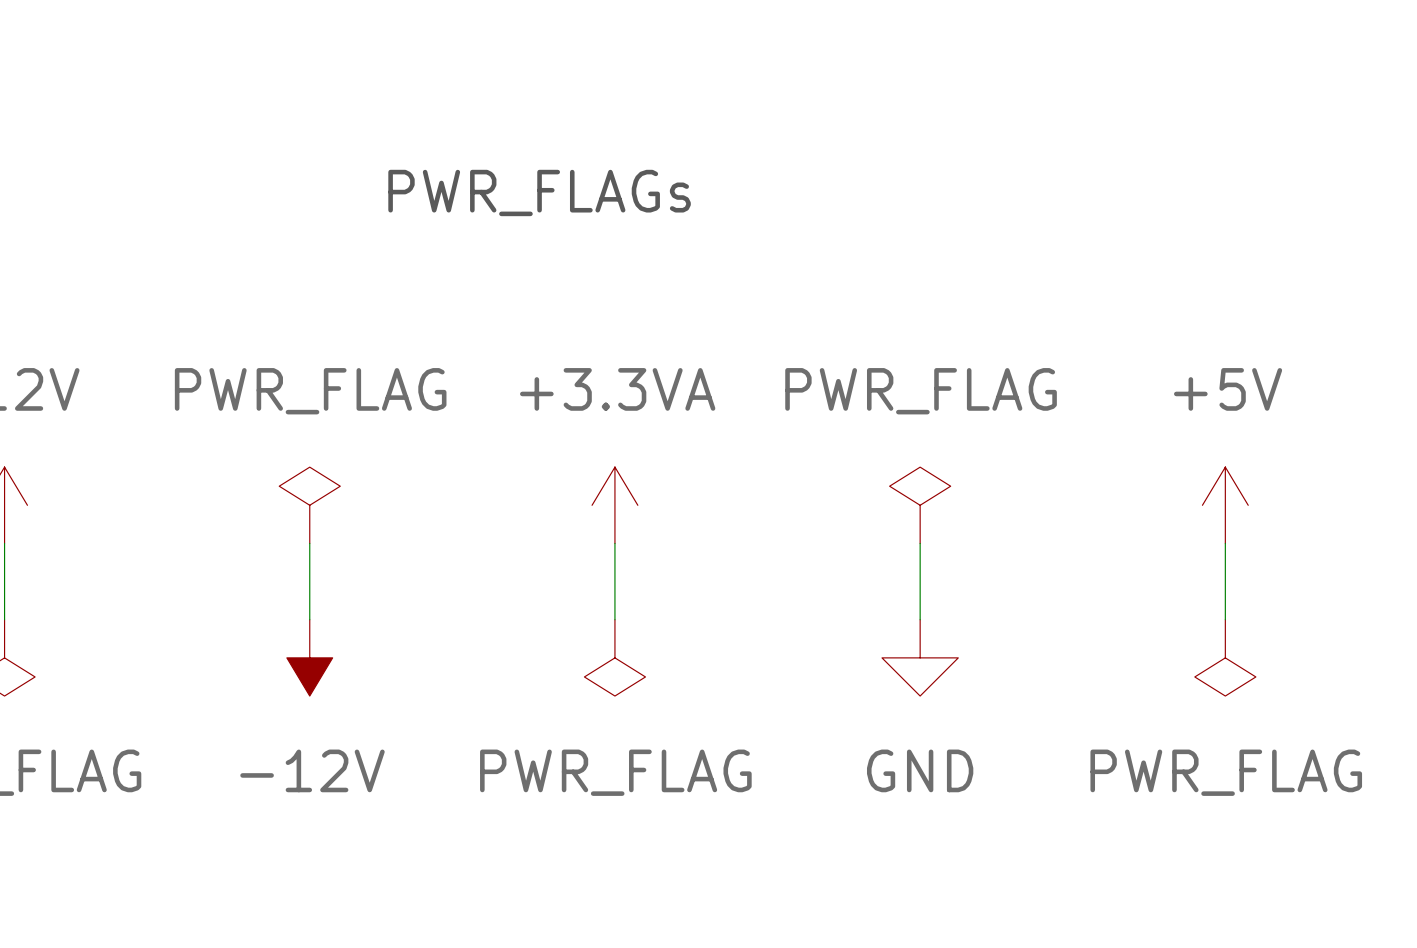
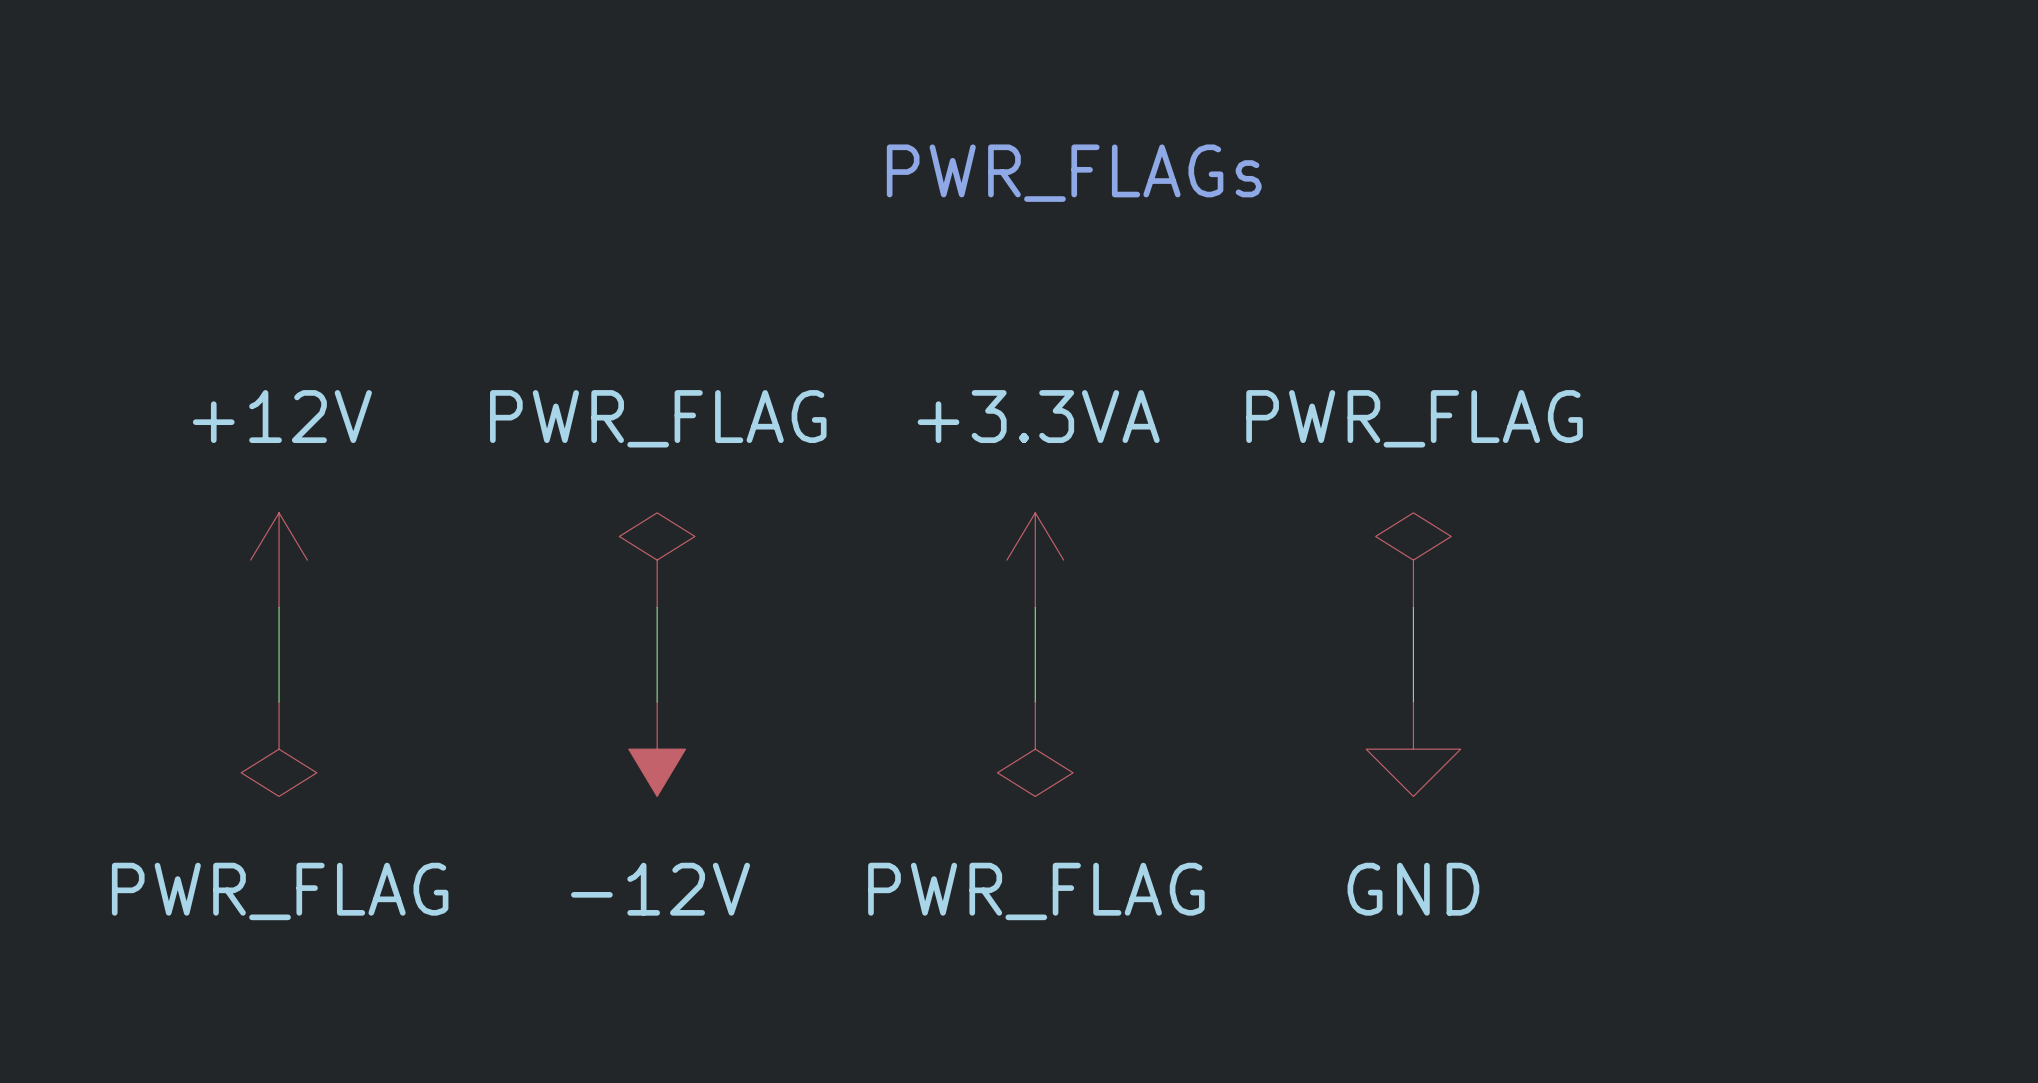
text position: PWR_FLAGs (539, 192) -> PWR_FLAGs (1074, 173)
power symbol: +5V (1225, 505) -> none
wire: (1225, 543) (1225, 619) -> none
power symbol: PWR_FLAG (1225, 657) -> none

